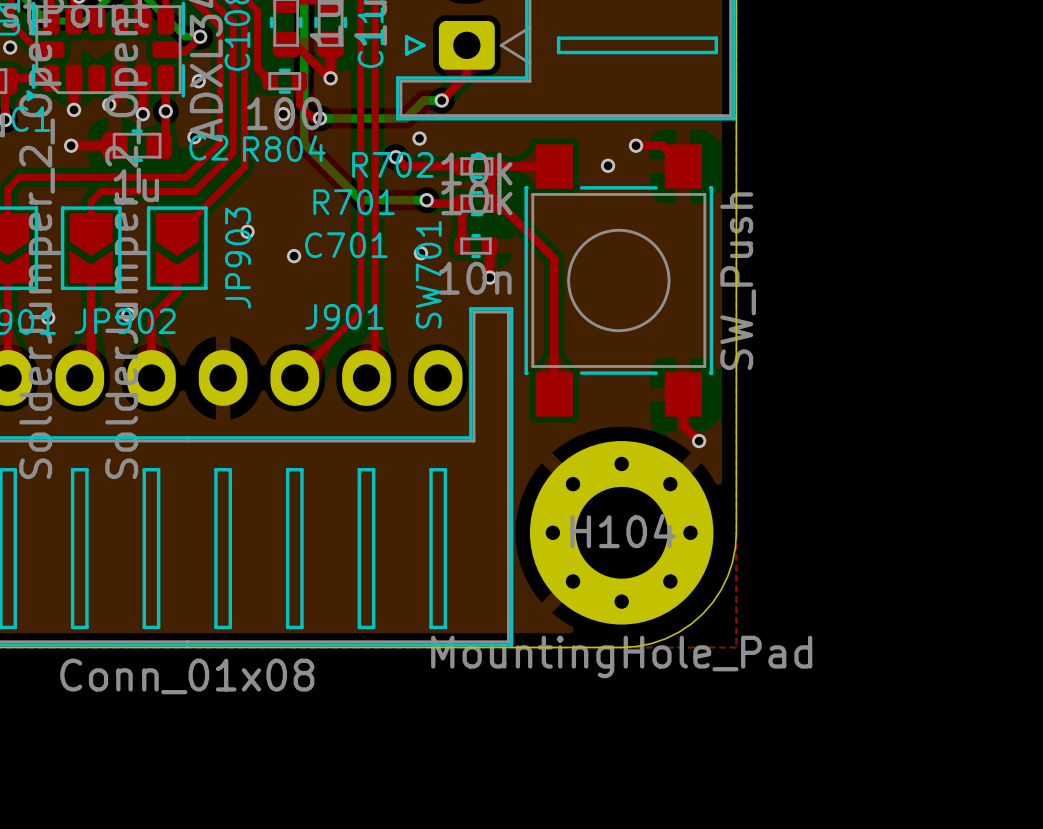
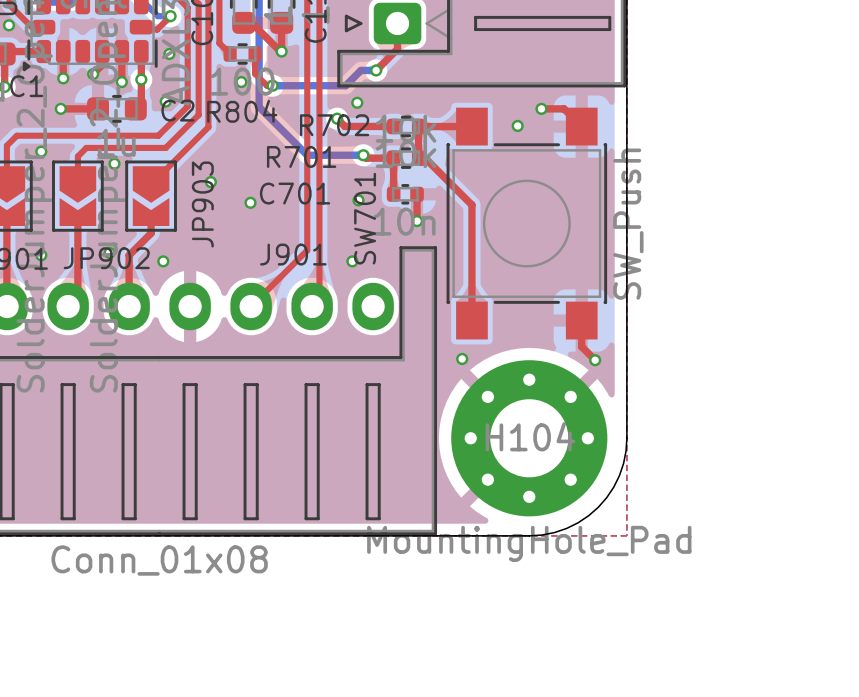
via: none -> (41, 151)
via: none -> (114, 163)
via: none -> (163, 261)
via: none -> (352, 261)
via: none -> (462, 358)

